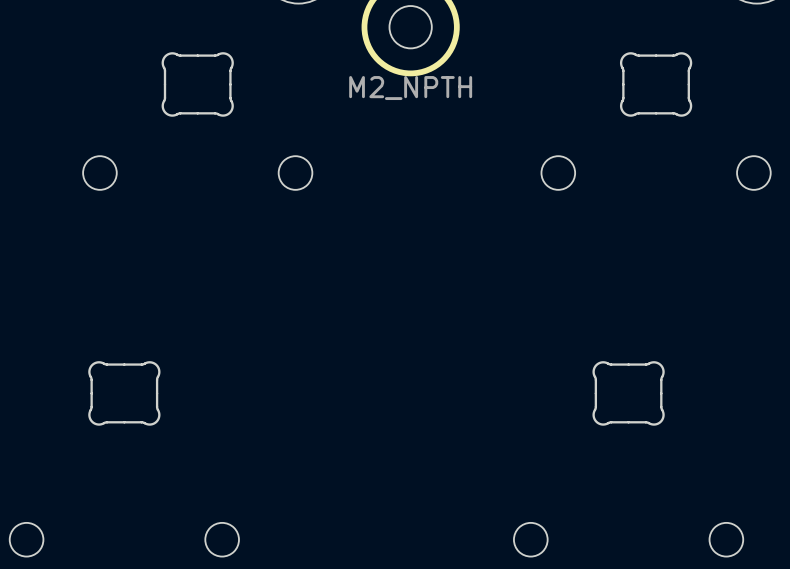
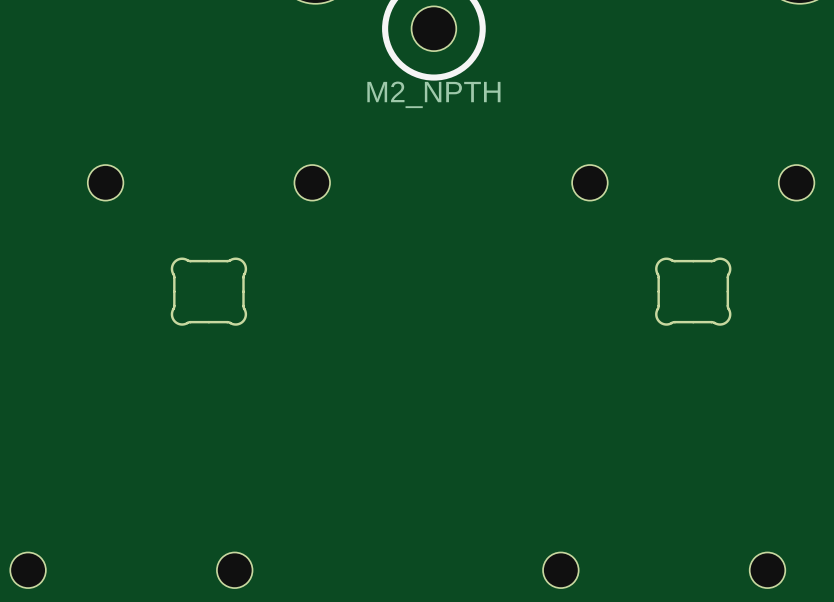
part: (197, 84) -> none
part: (656, 84) -> none
part: none -> (208, 291)
part: none -> (693, 291)
part: (124, 393) -> none
part: (628, 393) -> none

